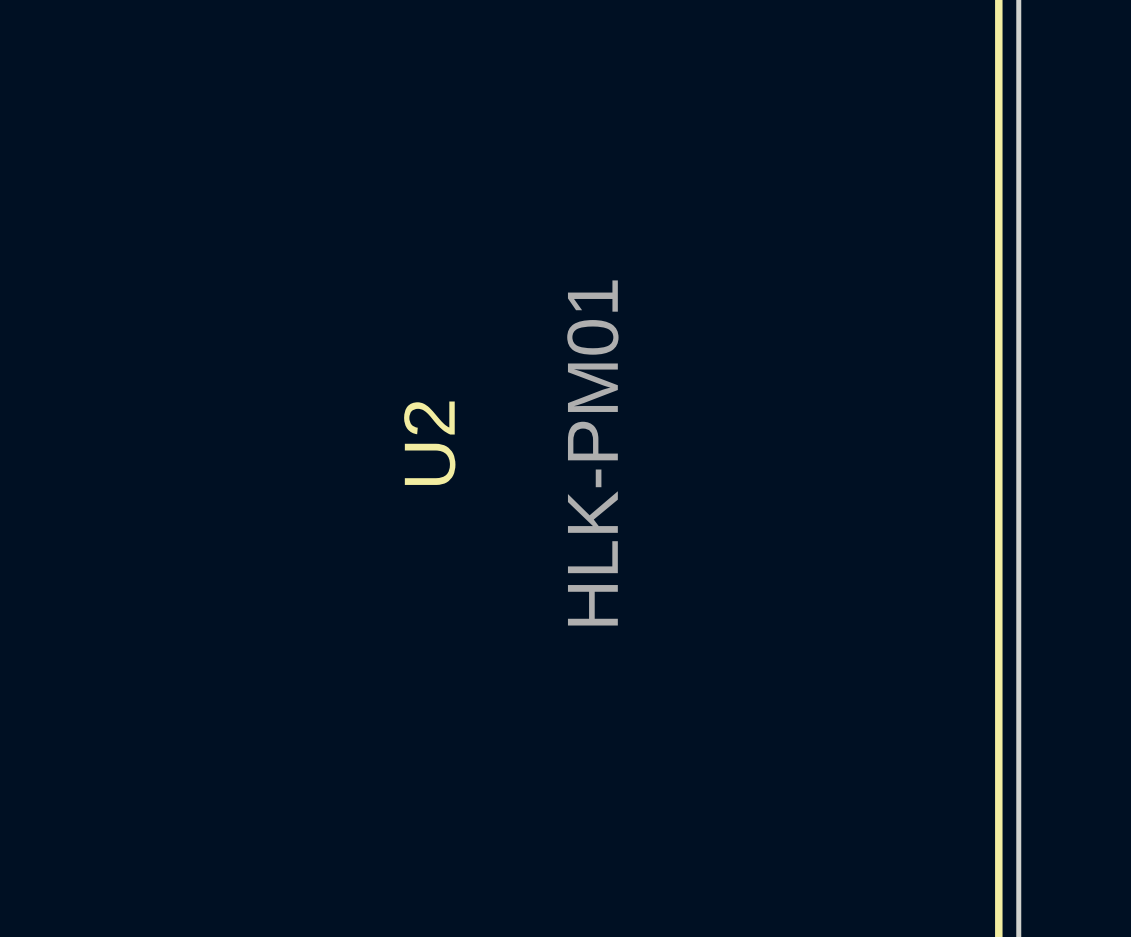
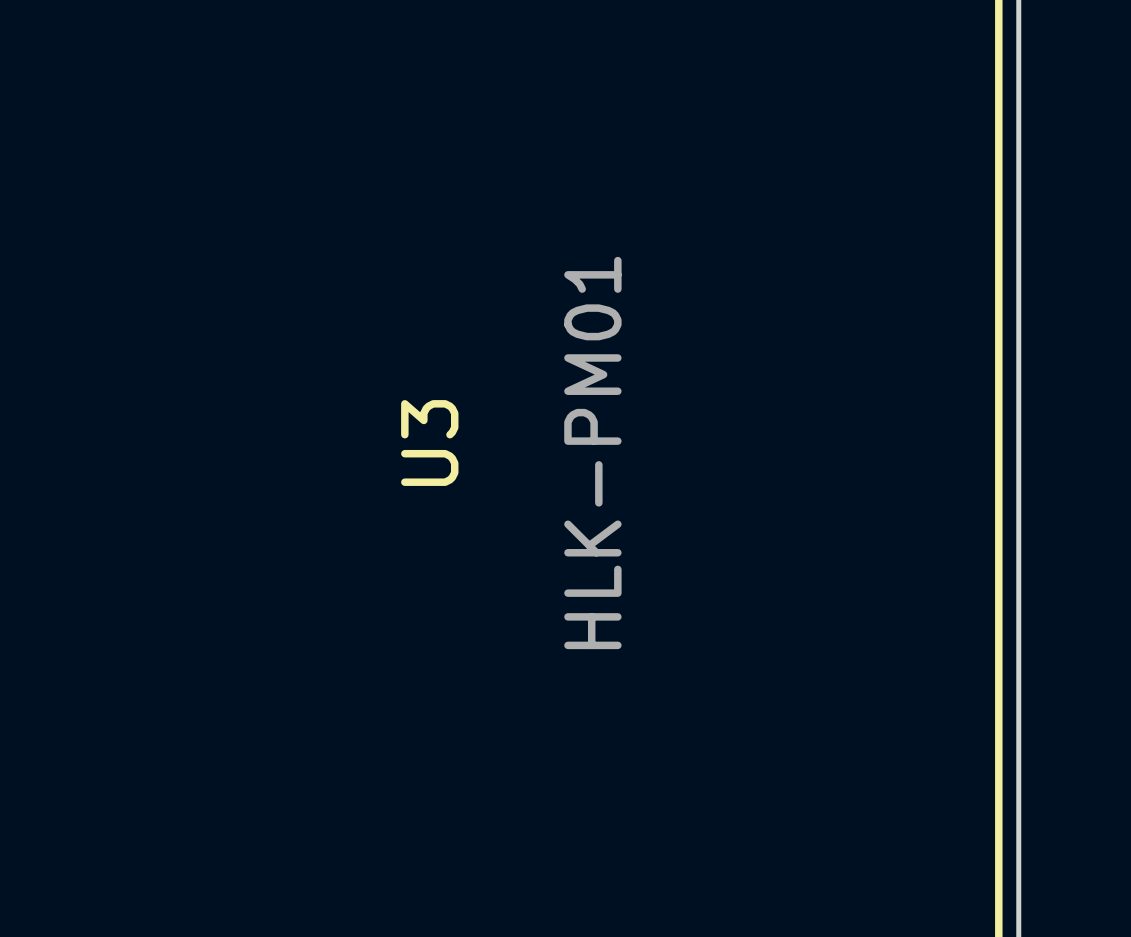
U2 name: U2 (429, 443) -> U3 (429, 443)

